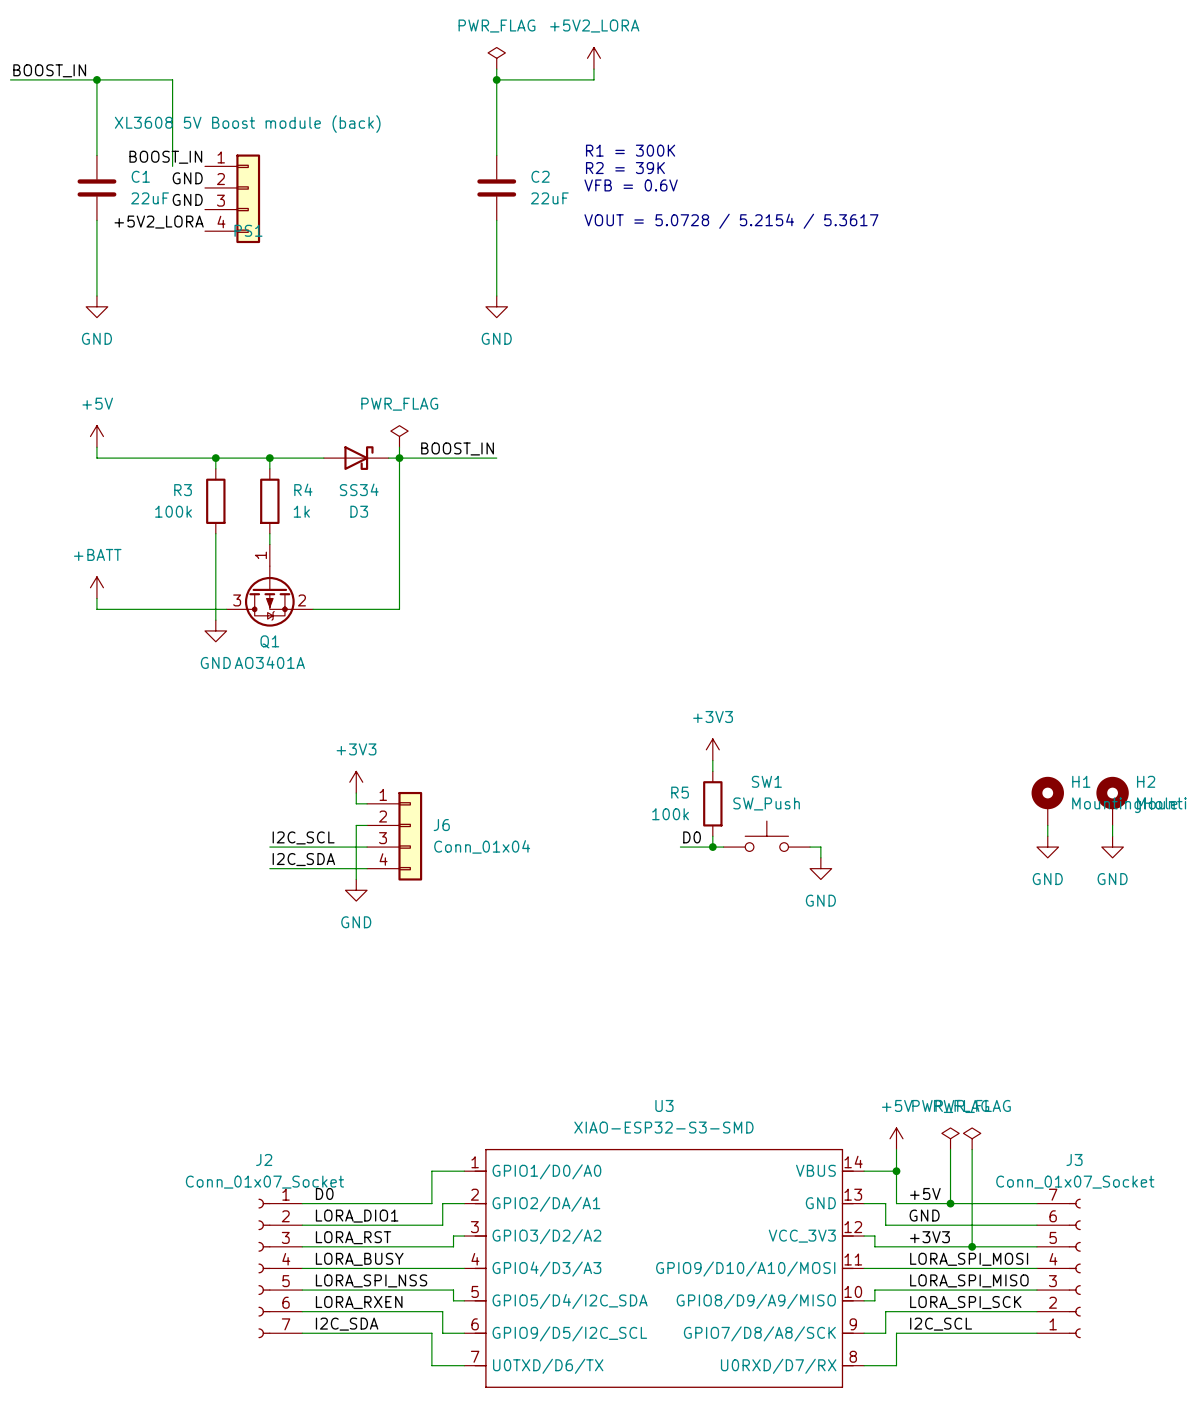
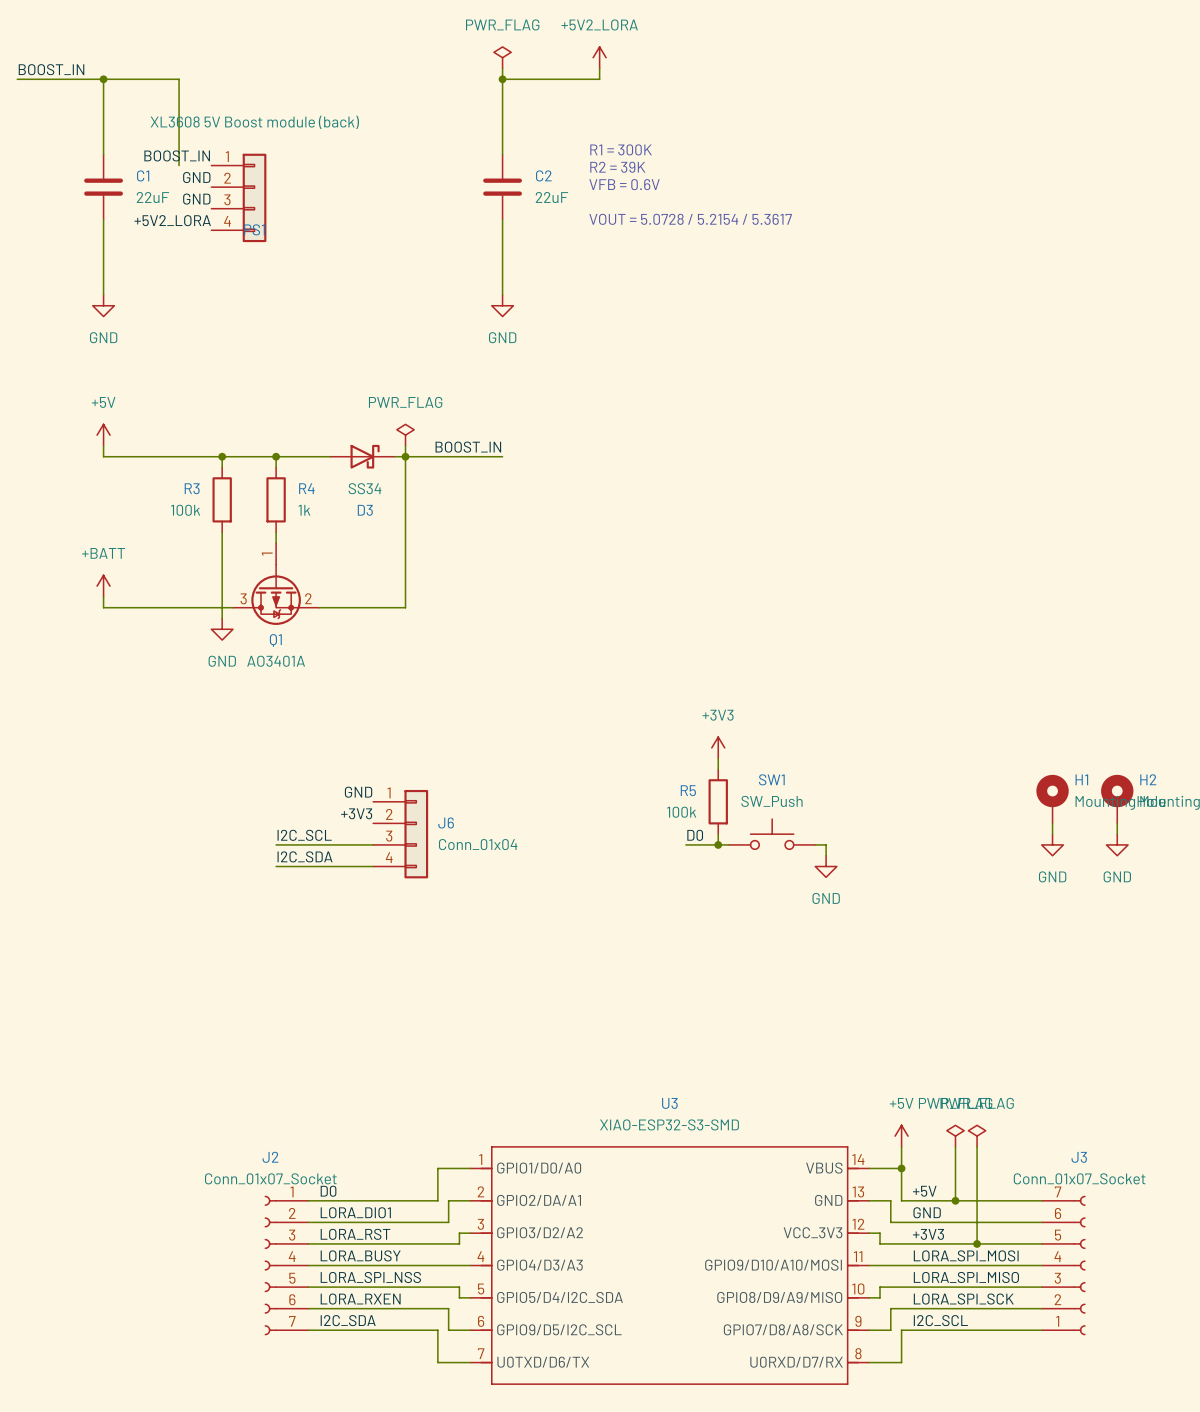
power symbol: +3V3 (356, 782) -> none
wire: (356, 793) (356, 803) (367, 803) -> none
label: none -> GND (358, 792)
label: none -> +3V3 (356, 813)
wire: (367, 825) (356, 825) (356, 879) -> none
power symbol: GND (356, 890) -> none

